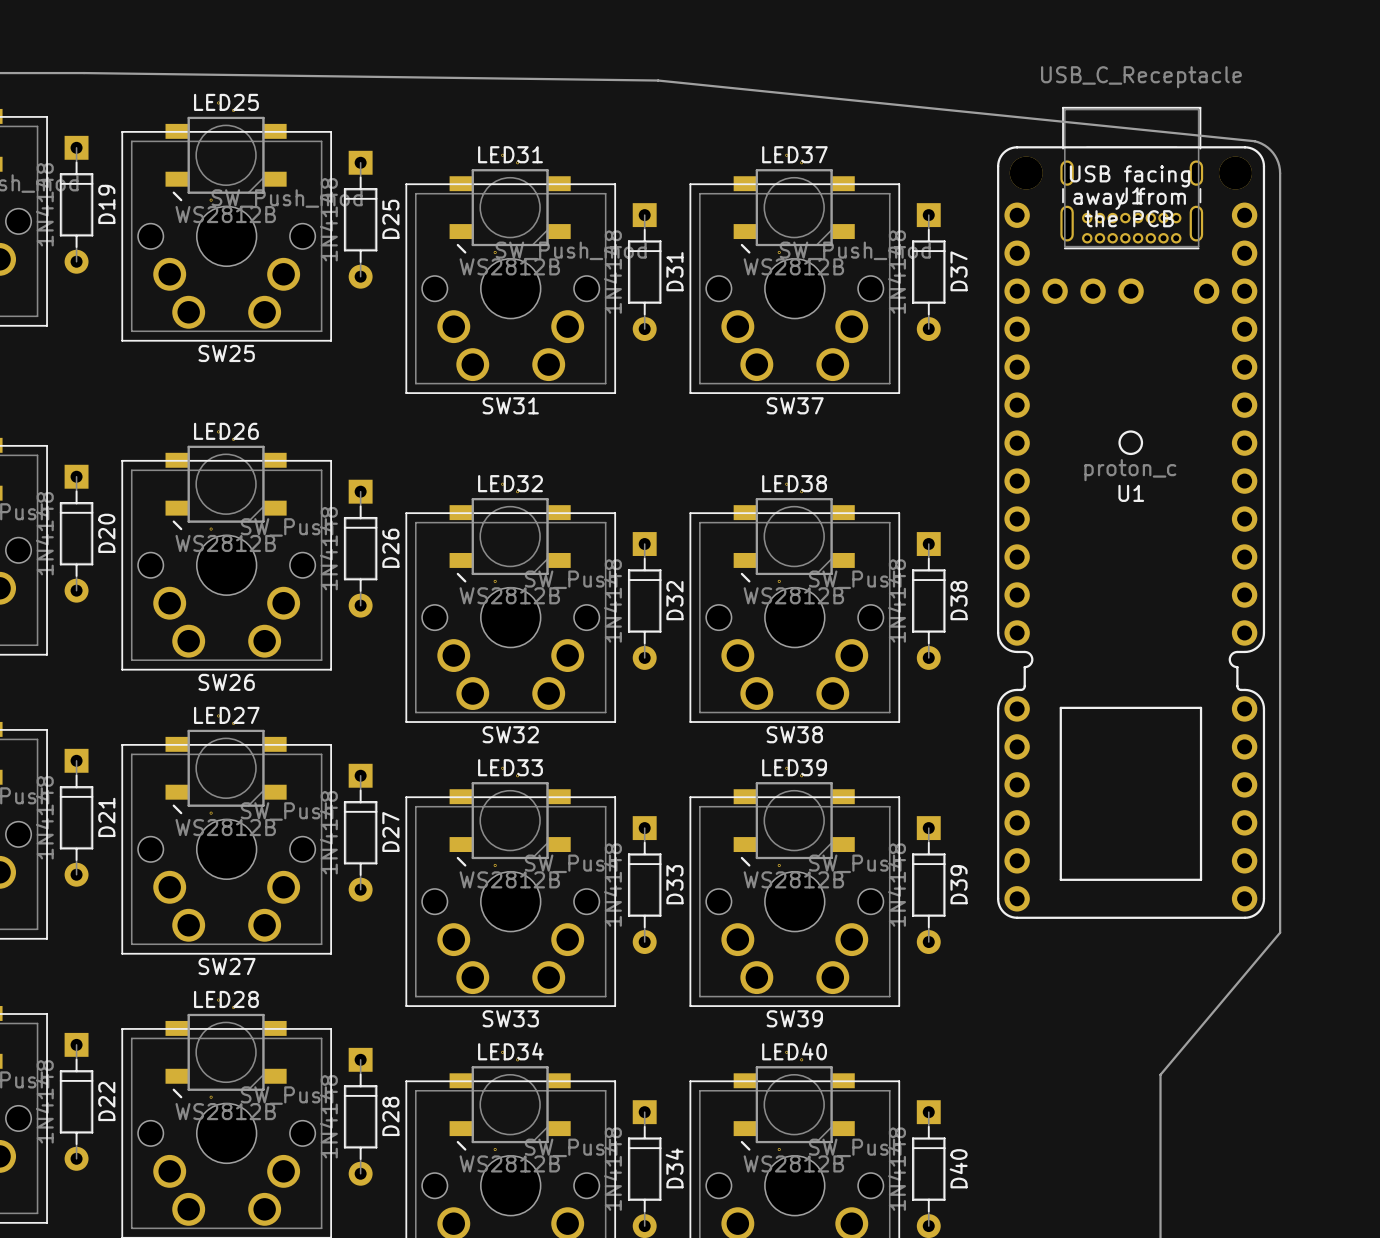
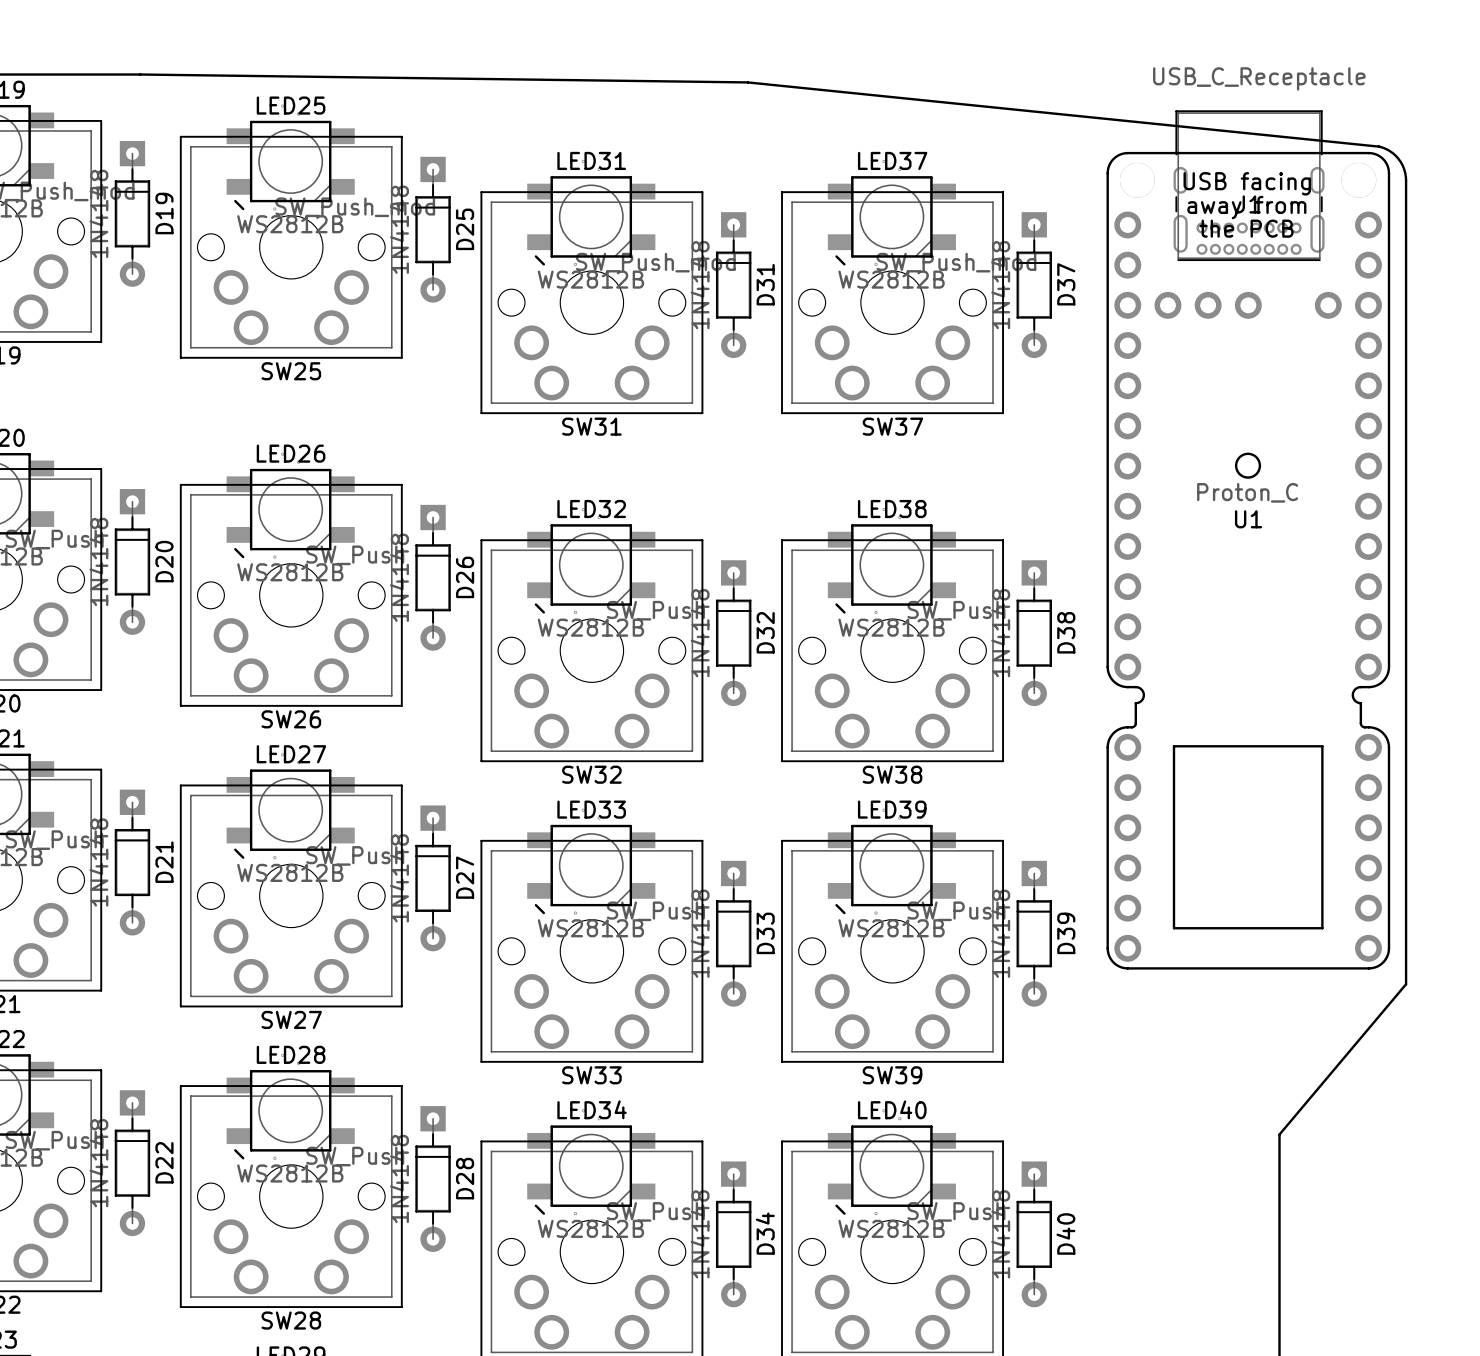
U1 value: proton_c (1130, 470) -> Proton_C (1247, 492)

